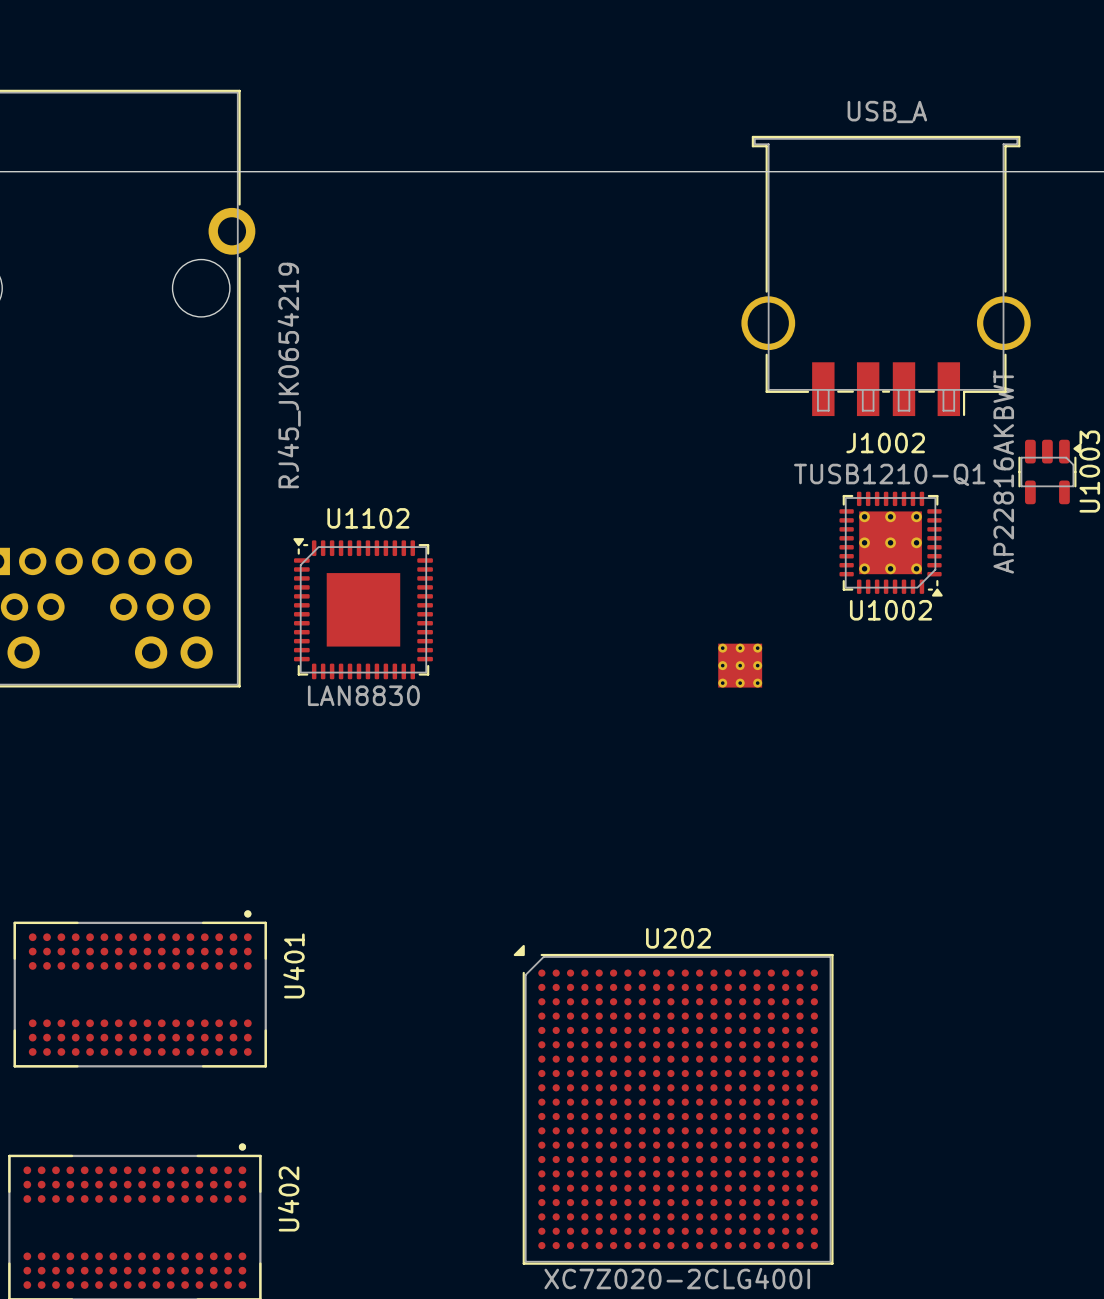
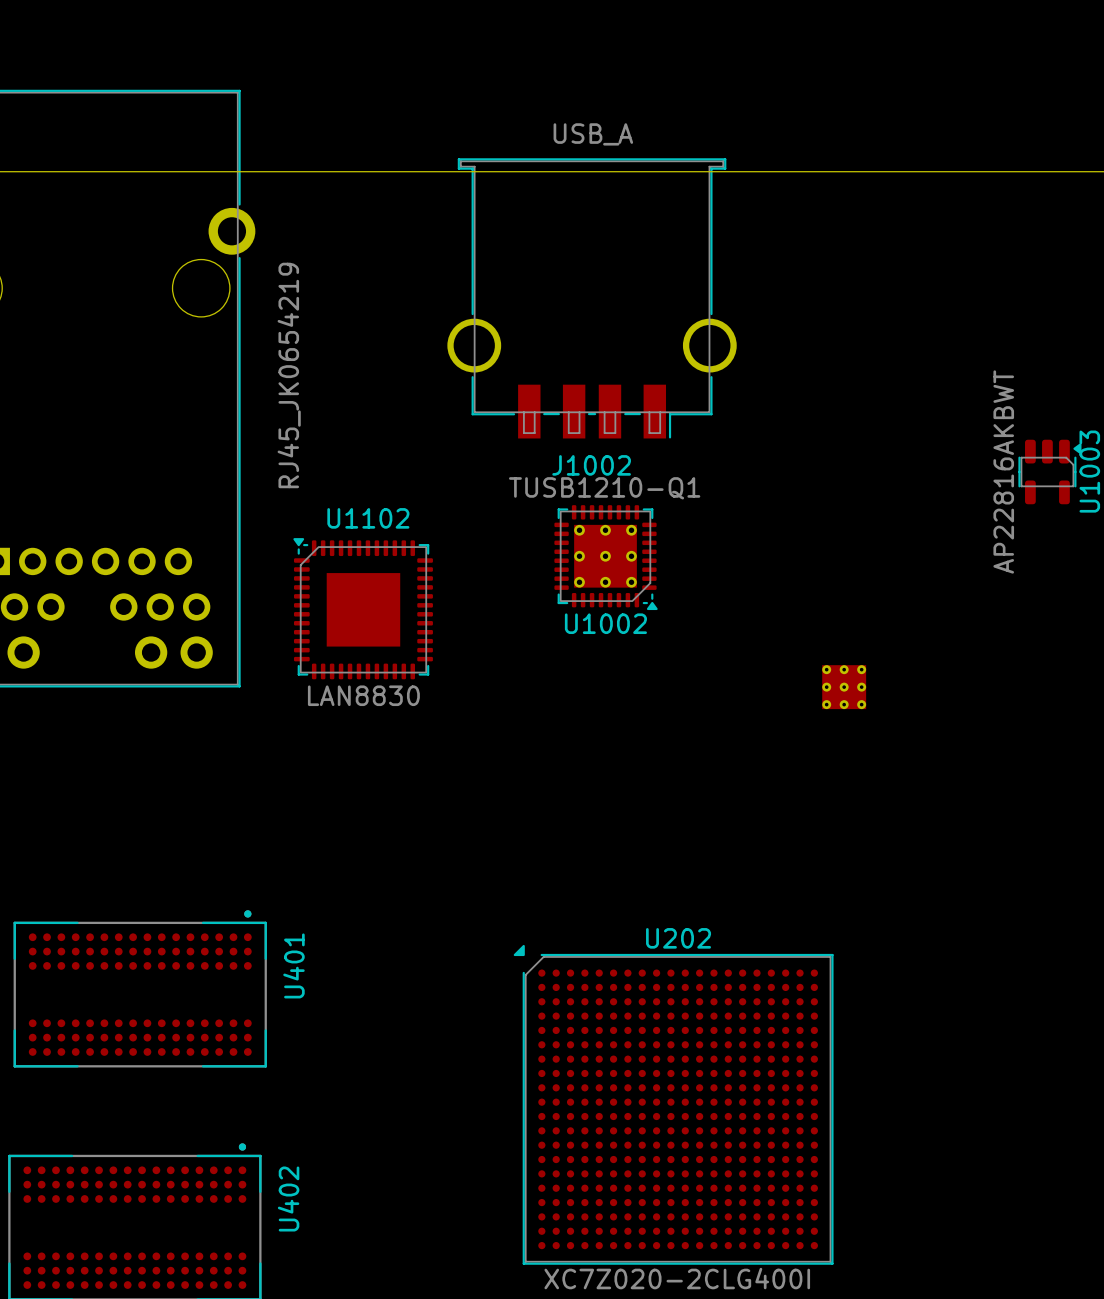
J1002 position: (886, 275) -> (592, 298)
U1002 position: (891, 544) -> (606, 557)
part position: (740, 665) -> (844, 687)

